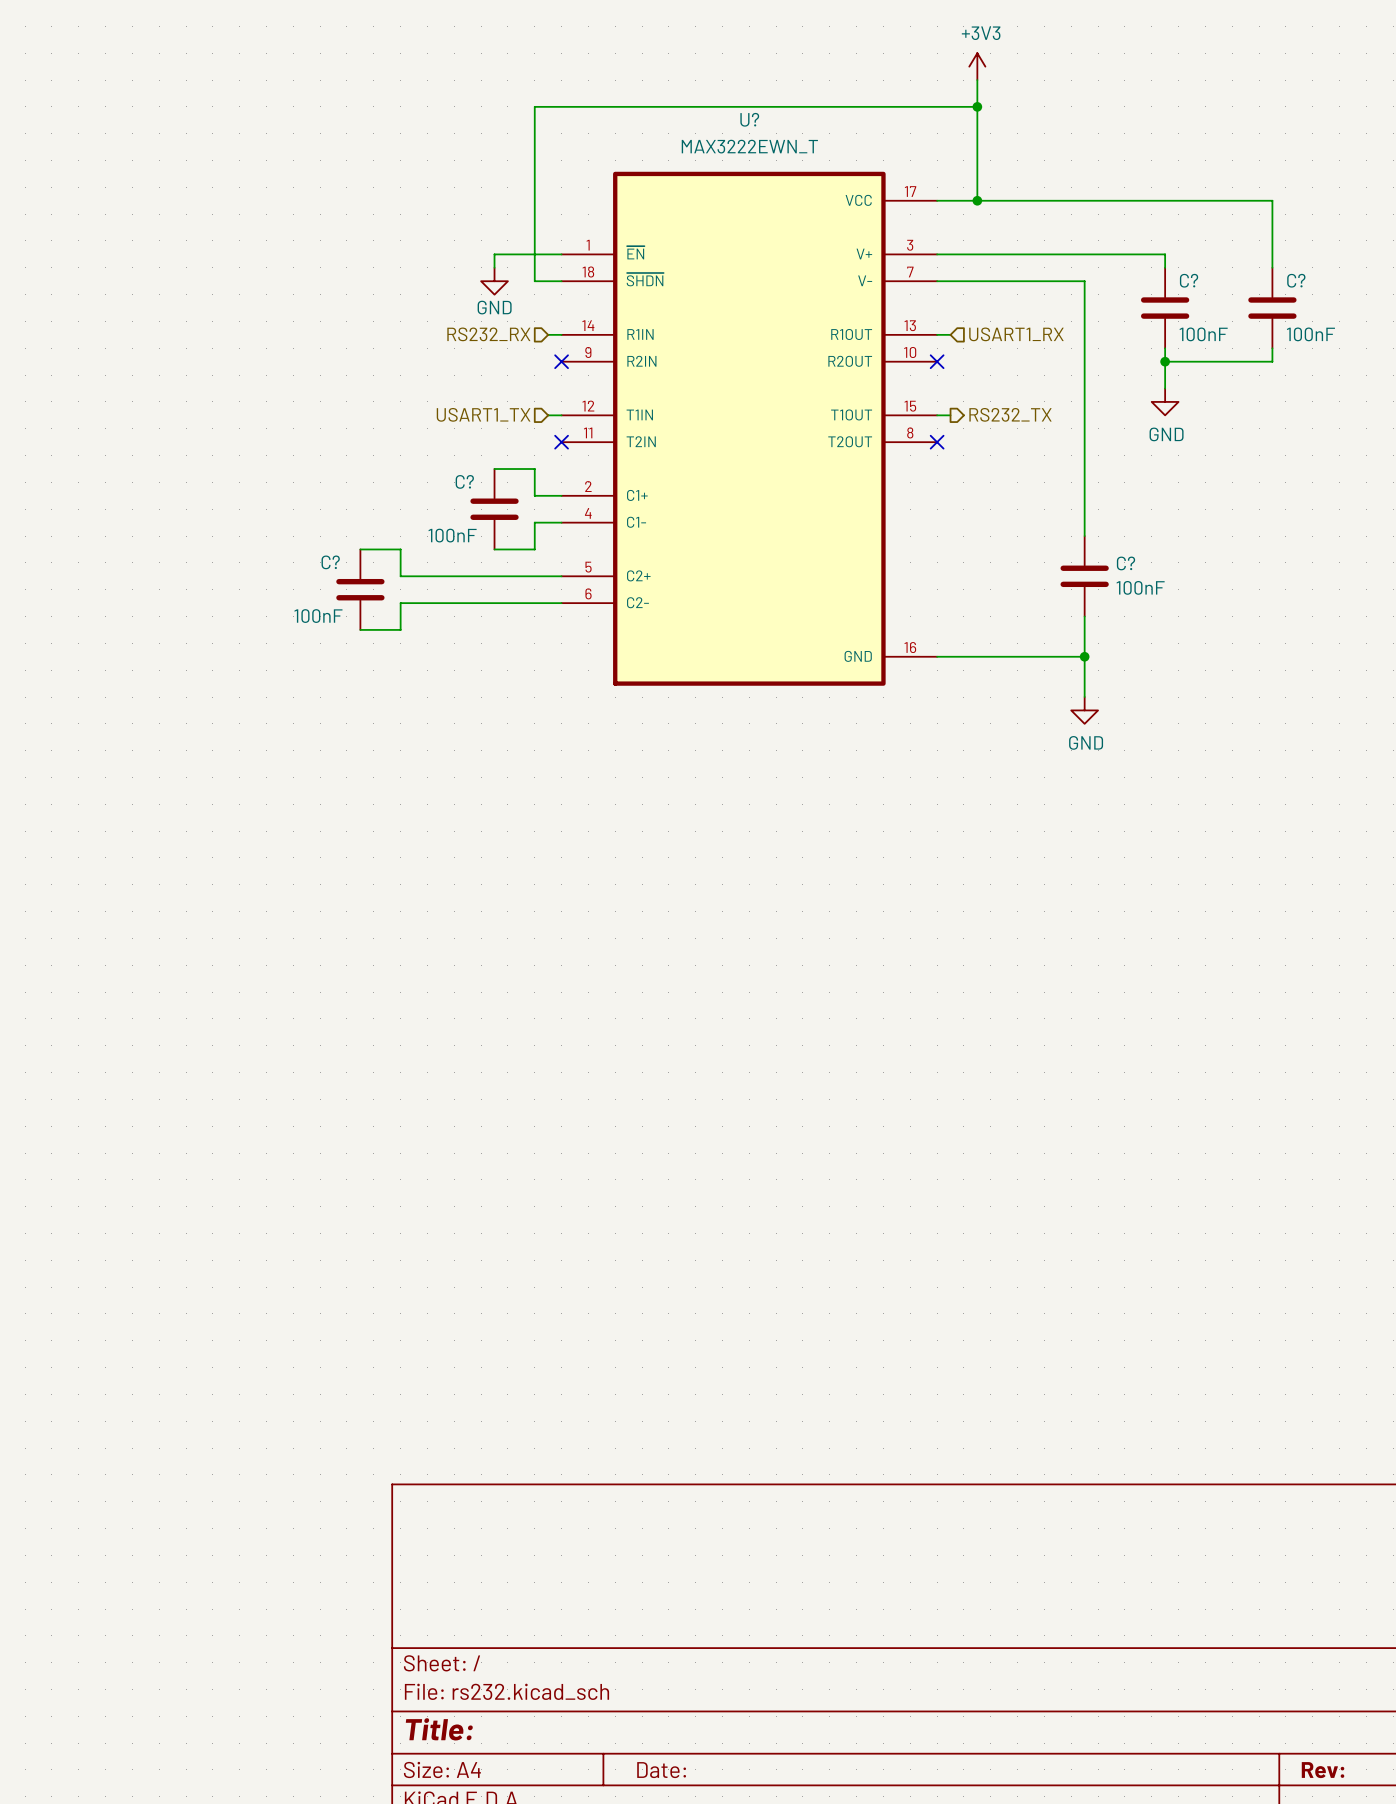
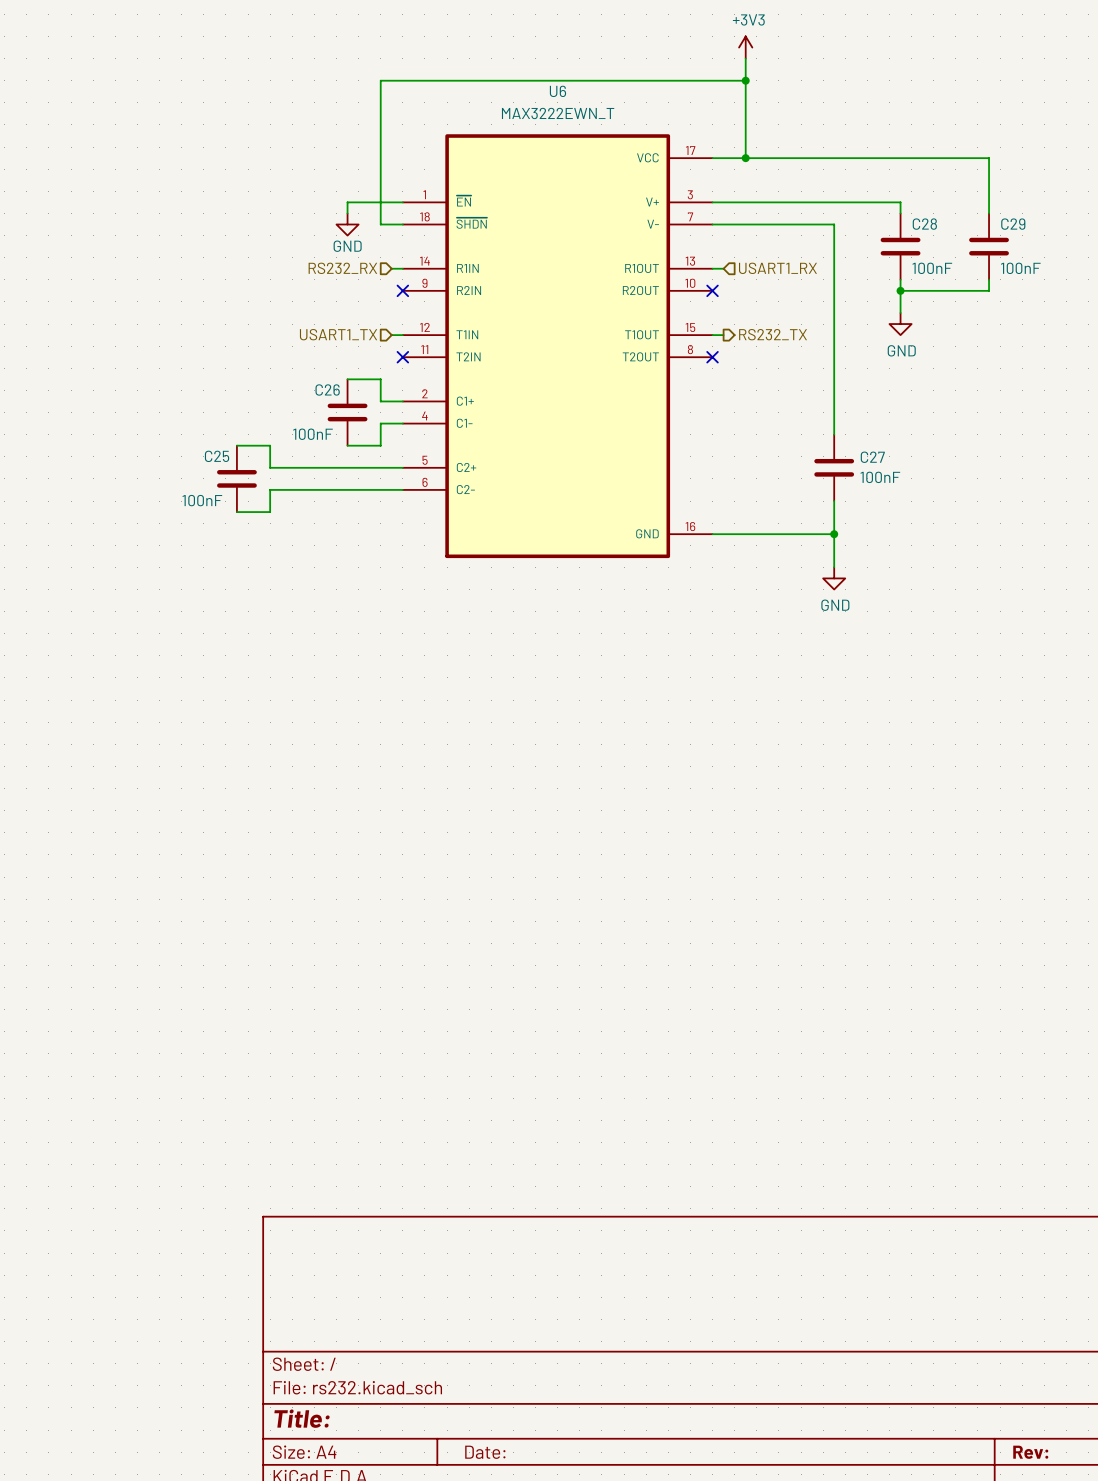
U? name: U? (749, 119) -> U6 (557, 91)
C? name: C? (1189, 280) -> C28 (924, 224)
C? name: C? (1296, 280) -> C29 (1013, 224)
C? name: C? (464, 481) -> C26 (327, 389)
C? name: C? (330, 562) -> C25 (217, 456)
C? name: C? (1126, 563) -> C27 (872, 457)

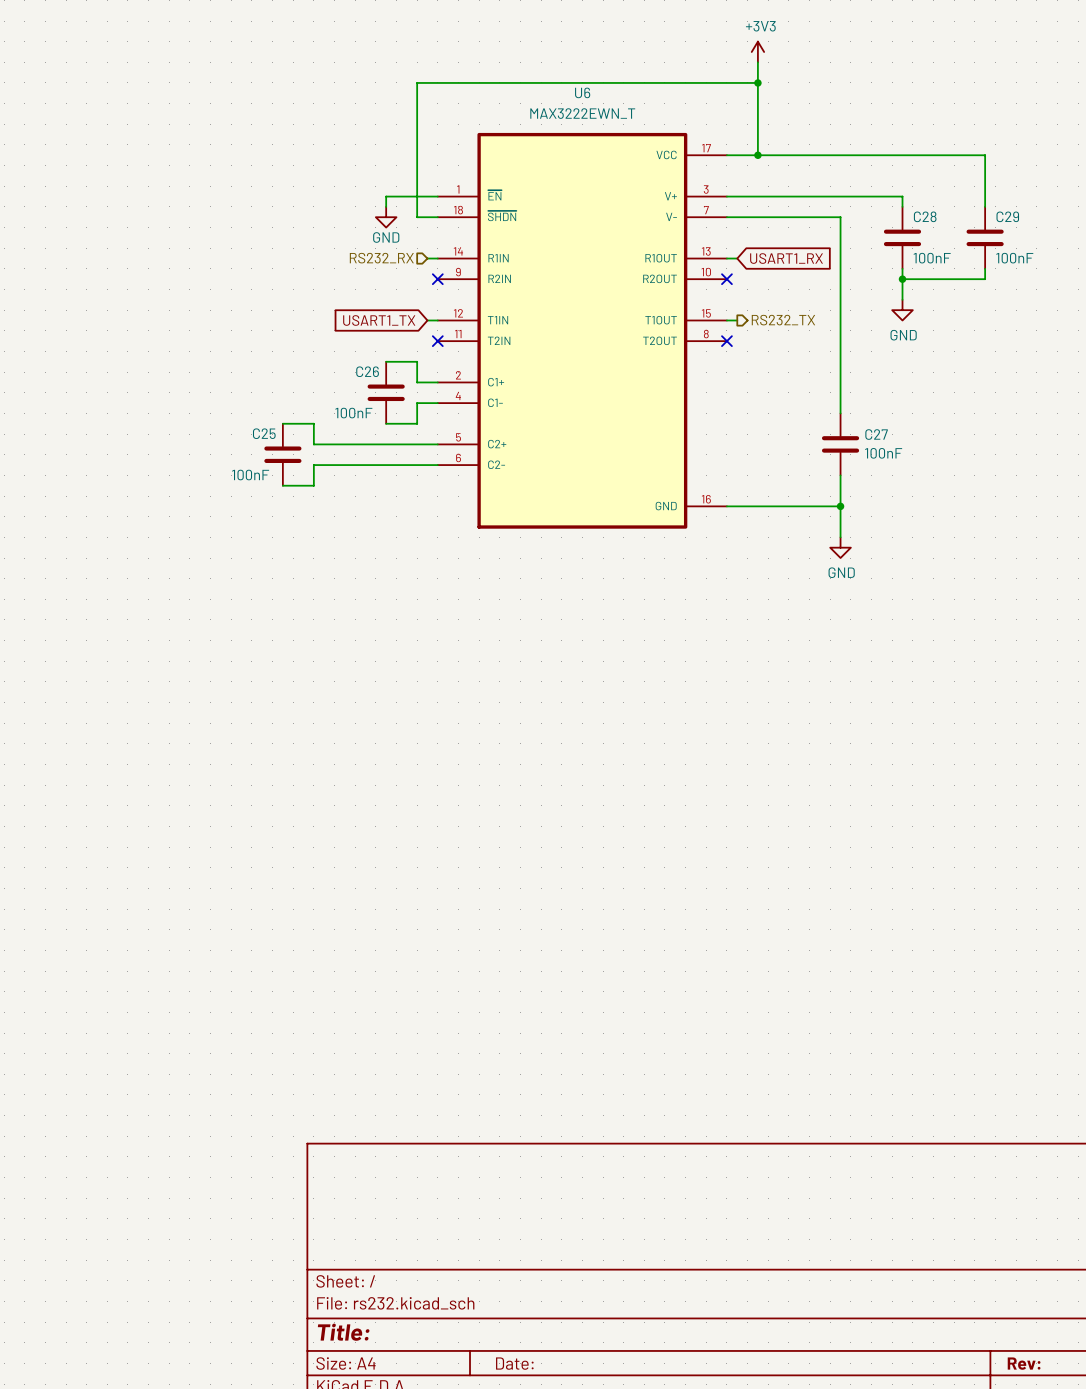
global label: none -> USART1_RX (786, 258)
hierarchical label: USART1_RX (777, 268) -> none
hierarchical label: USART1_TX (338, 334) -> none
global label: none -> USART1_TX (379, 320)

